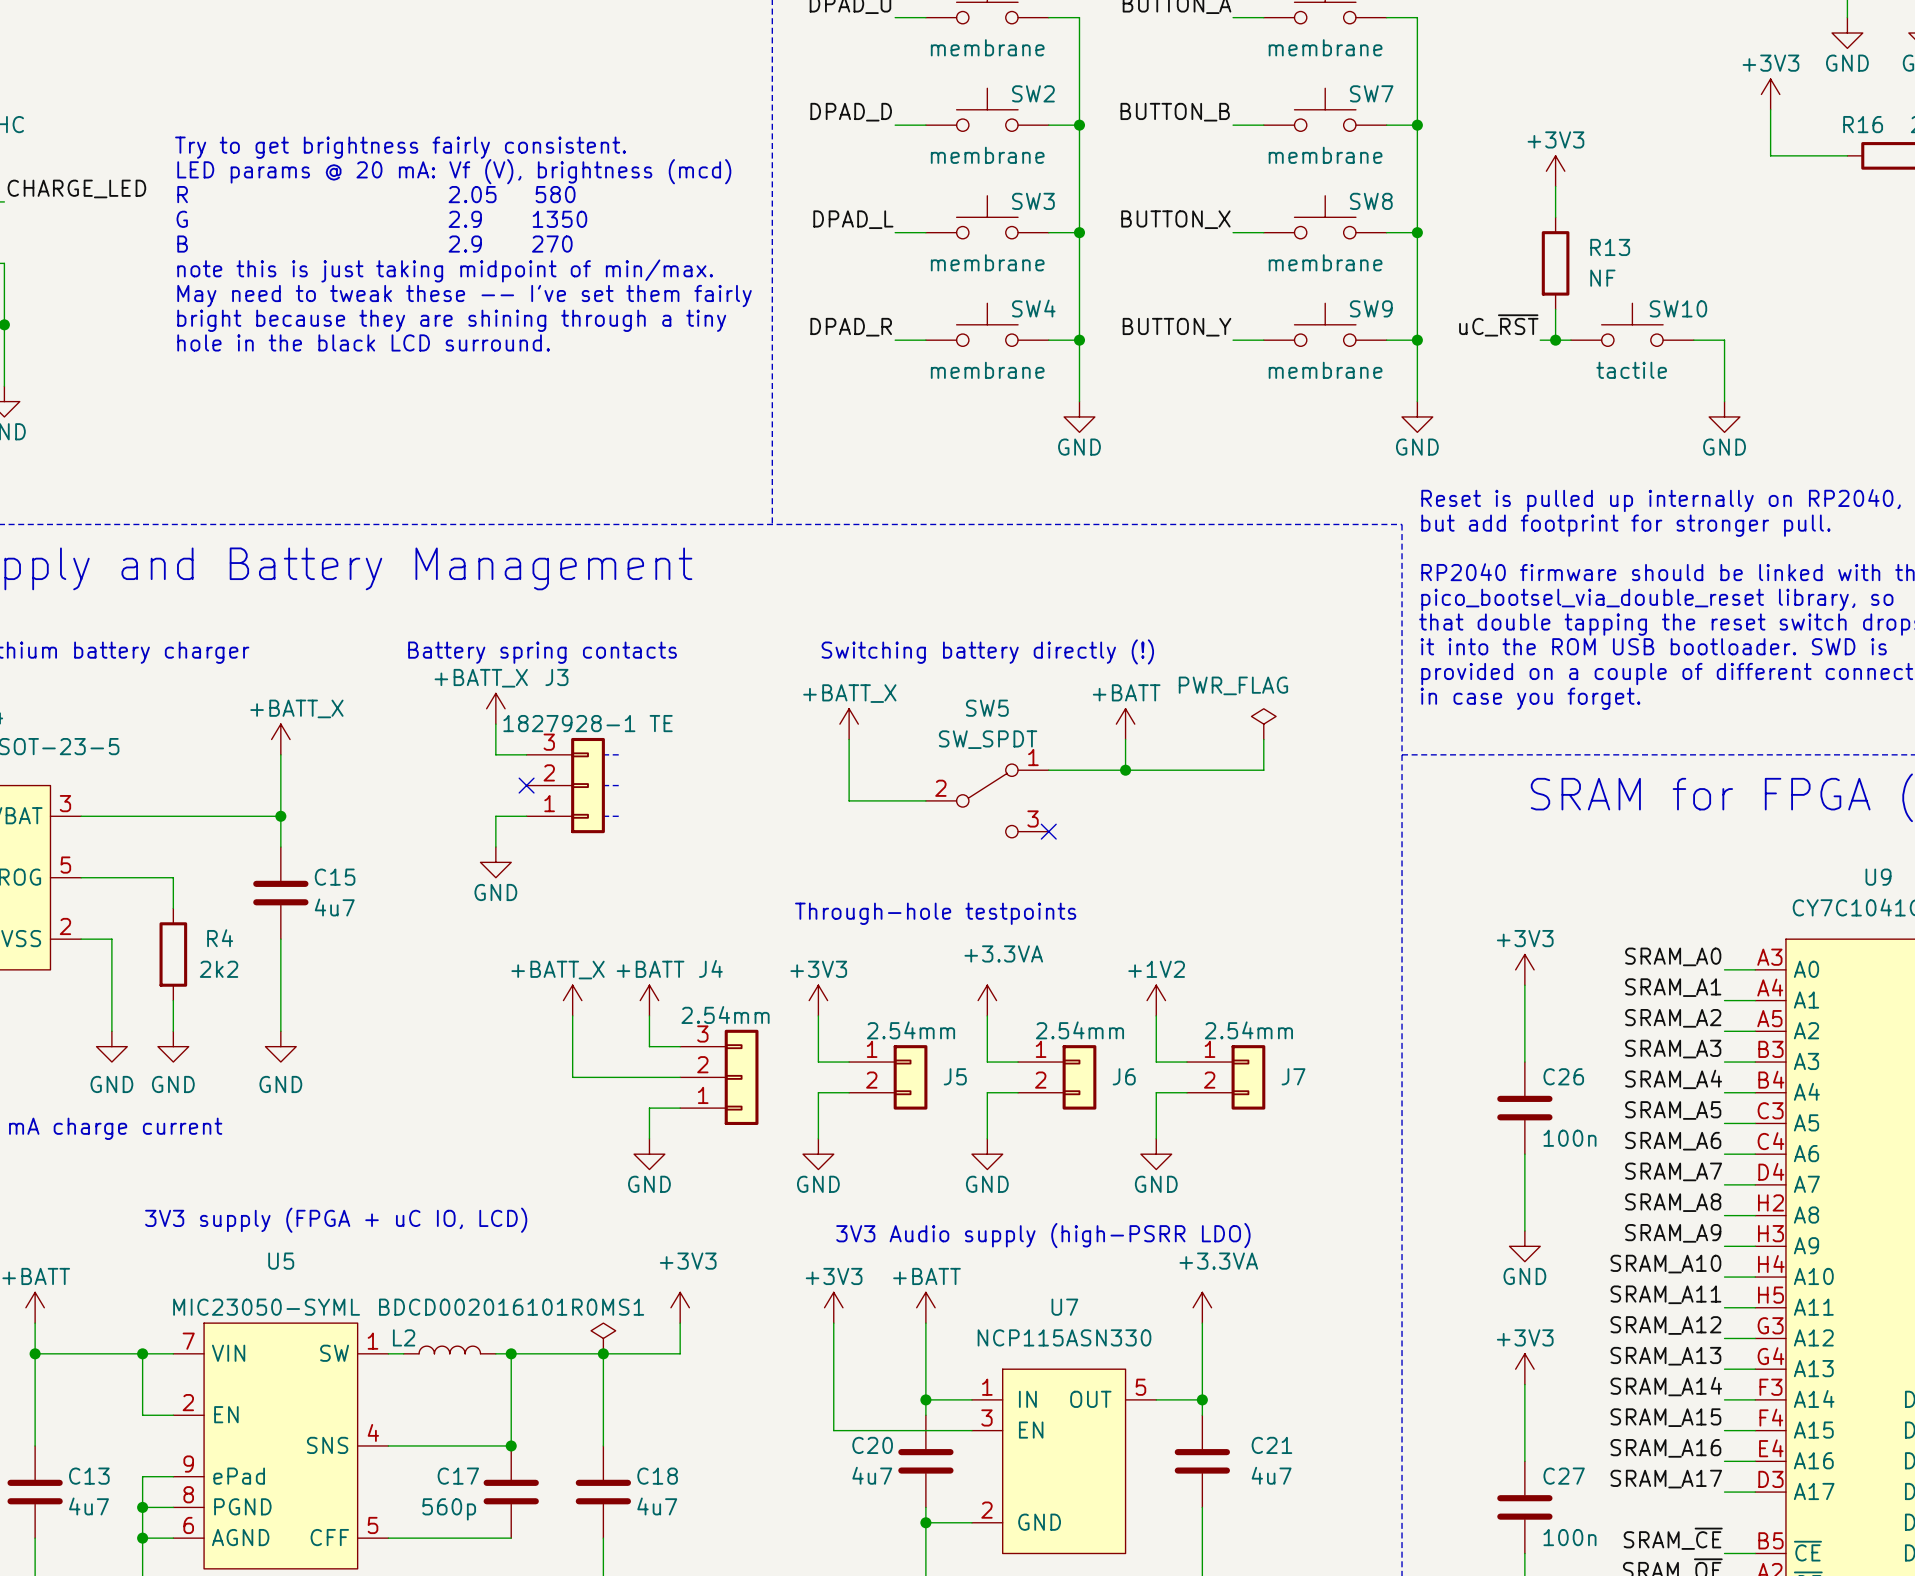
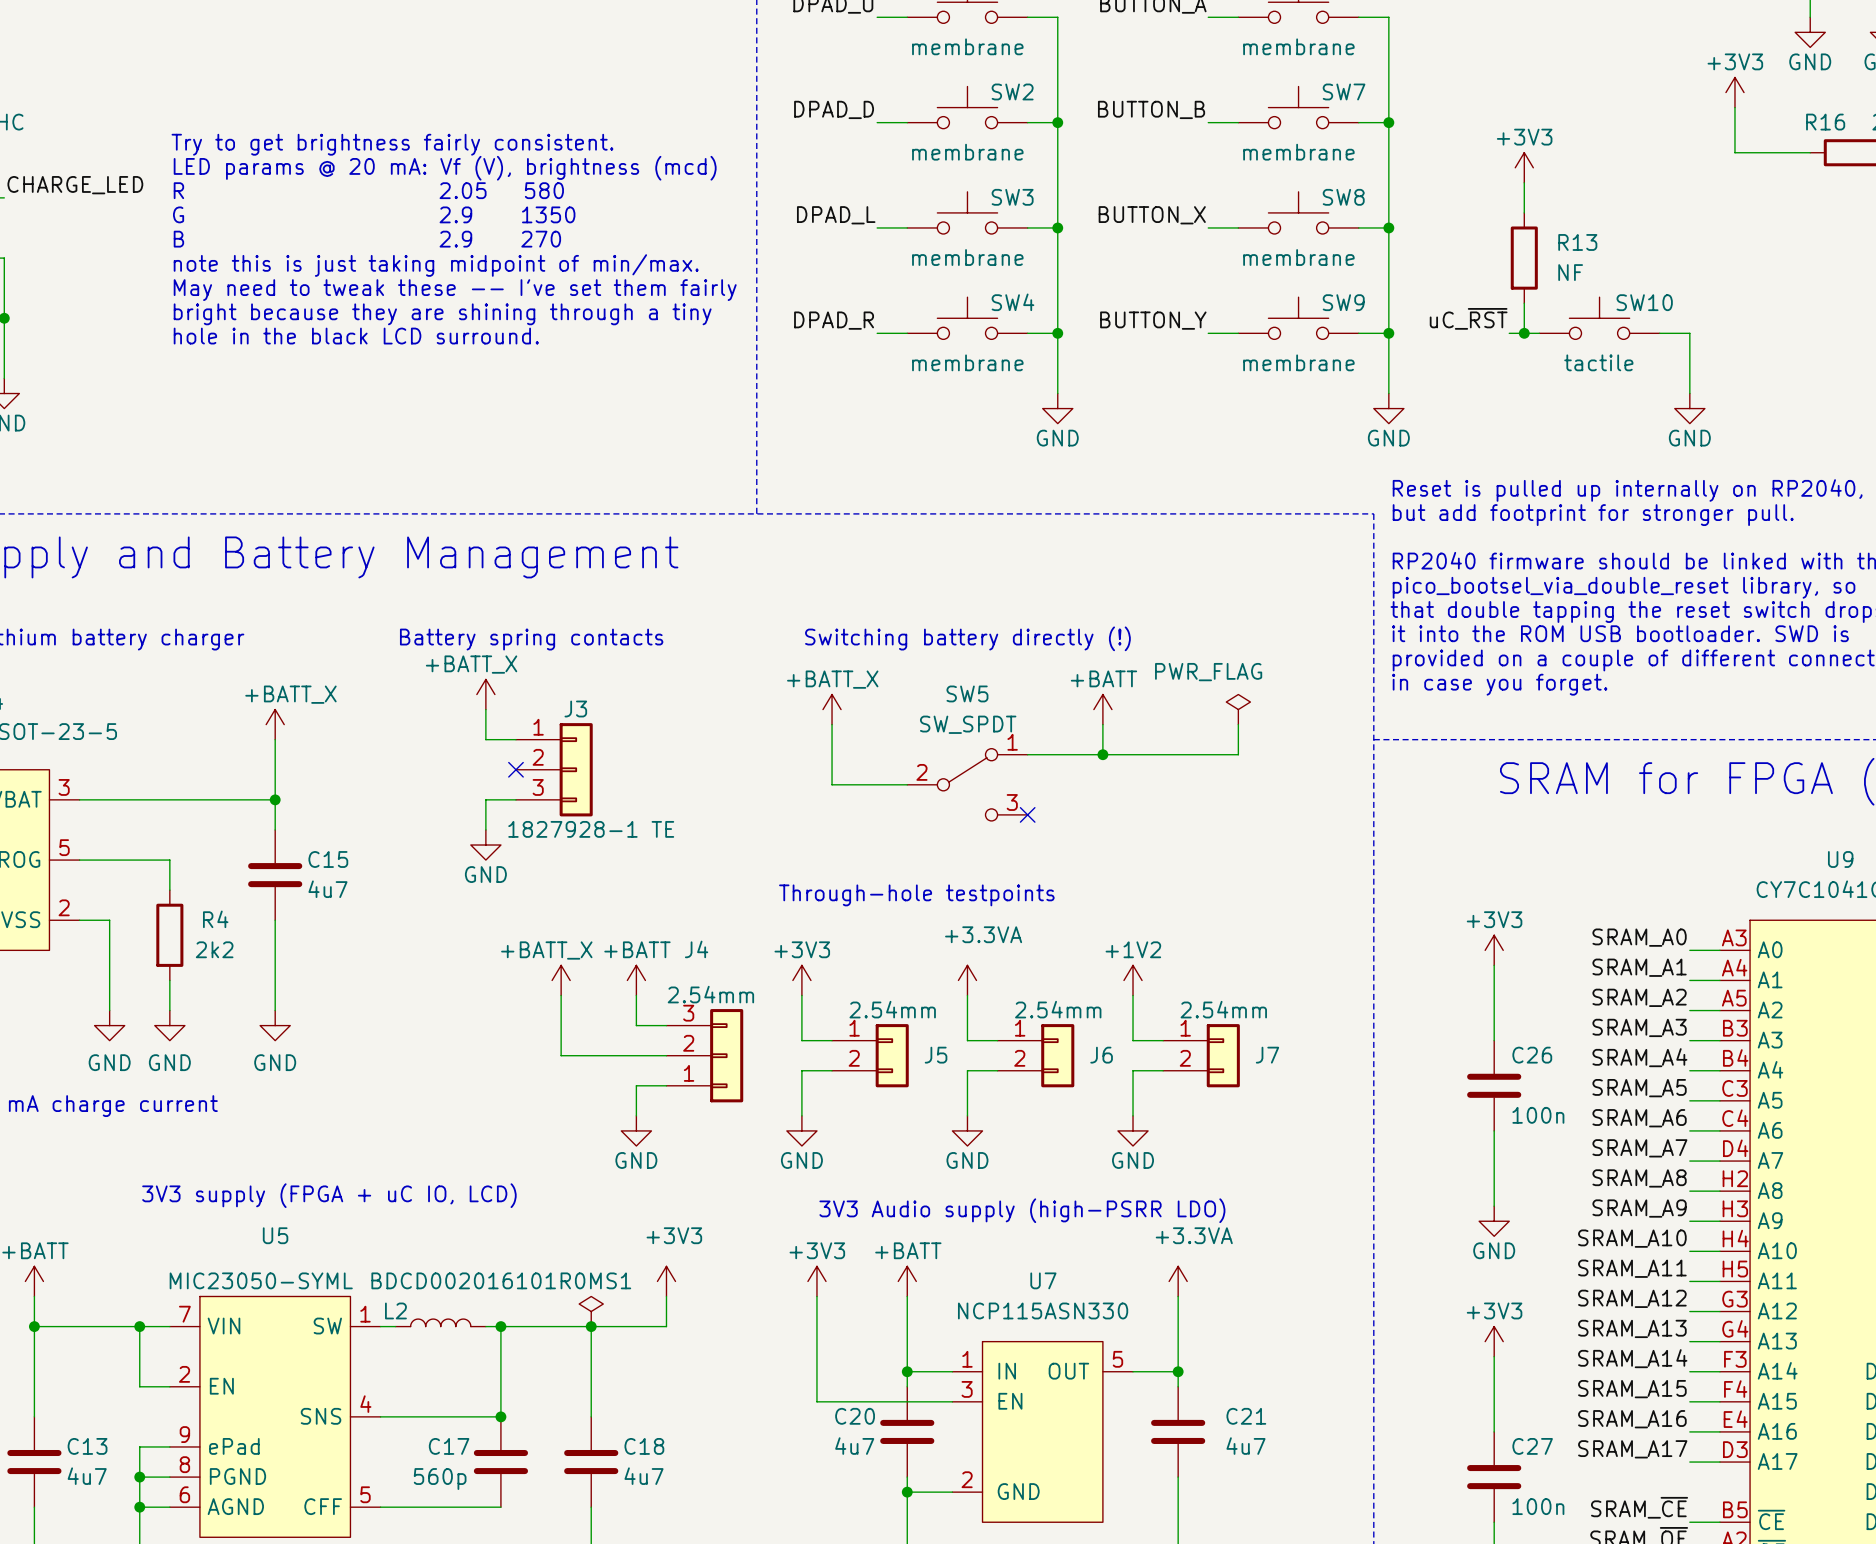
J3 name position: J3 (556, 677) -> J3 (575, 709)
line: (603, 754) (618, 754) -> none
J3 flip: as is (588, 785) -> up-down (576, 769)
line: (603, 785) (618, 785) -> none
line: (603, 816) (618, 816) -> none

